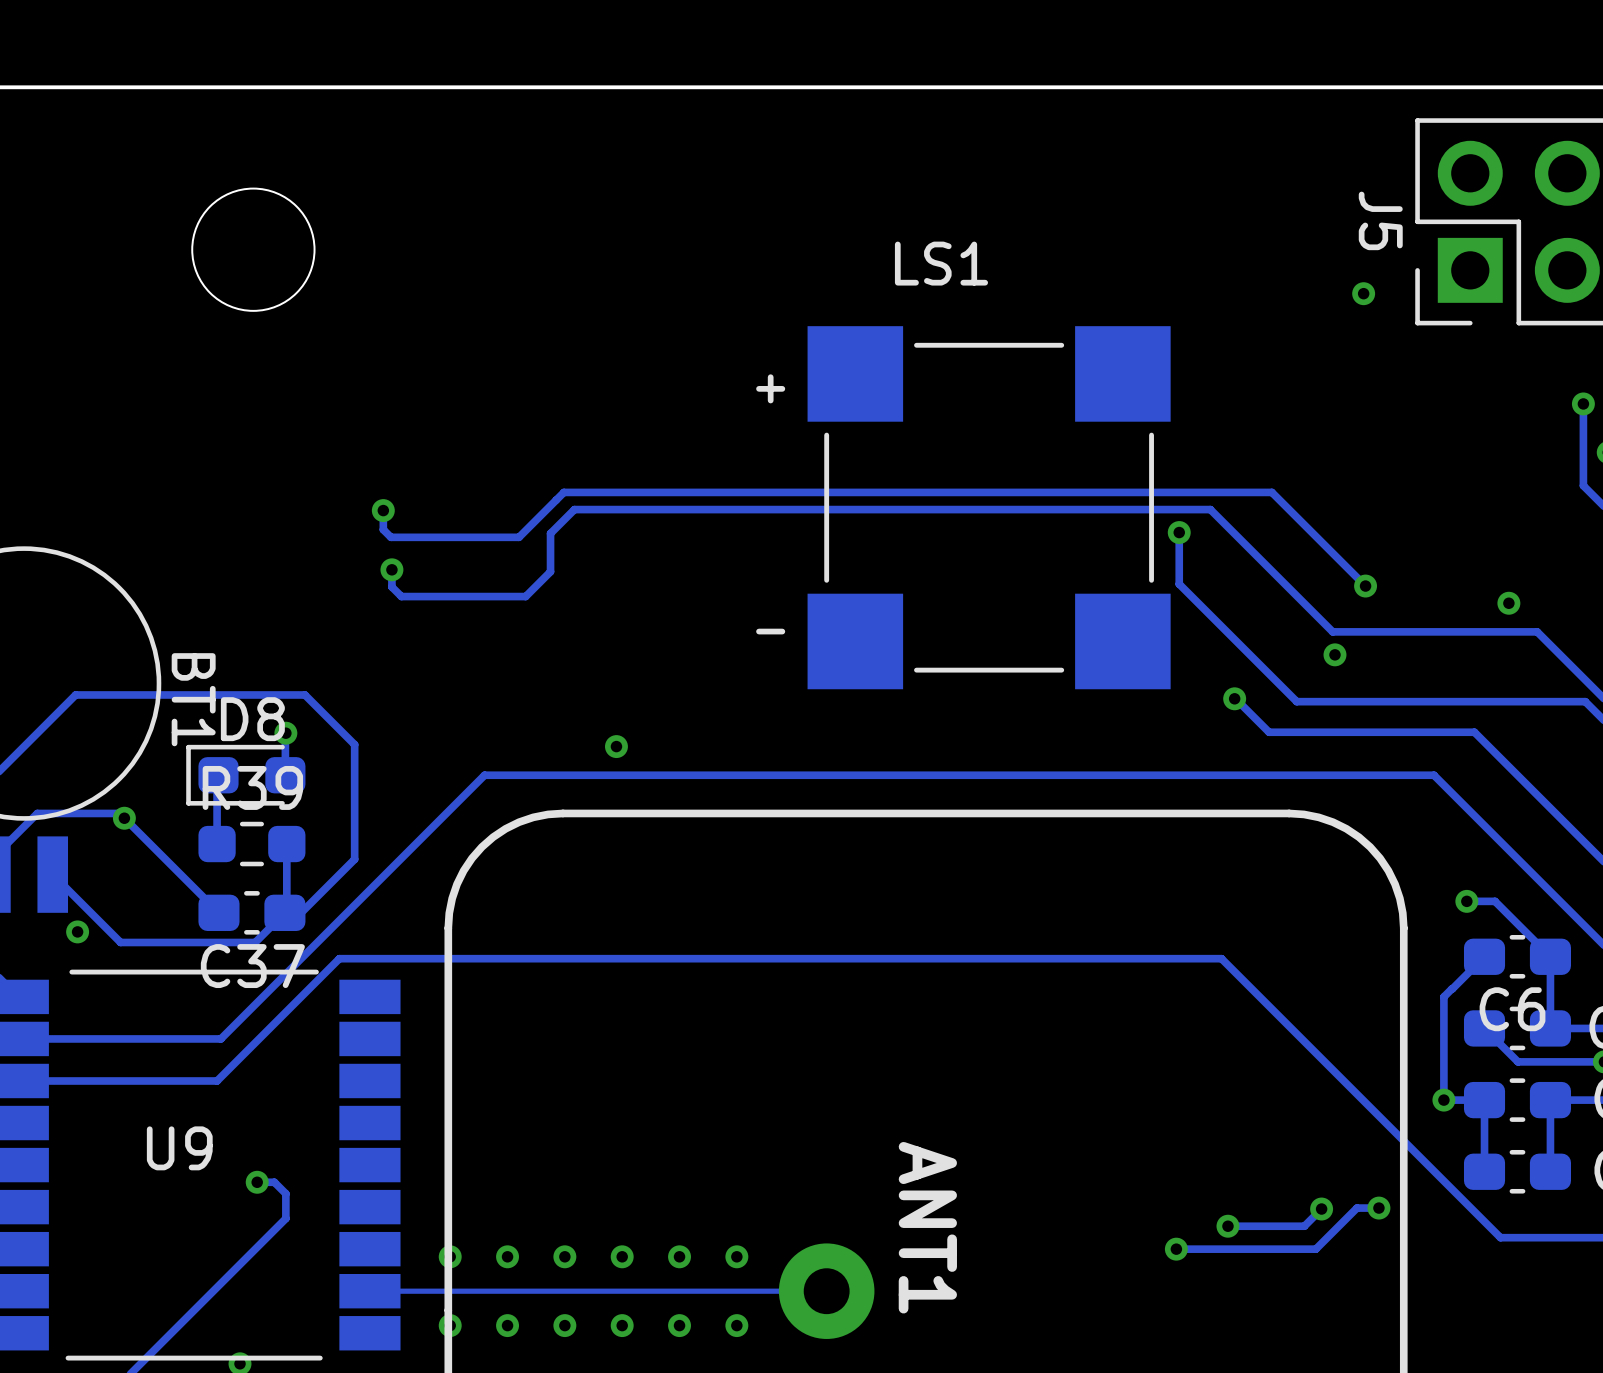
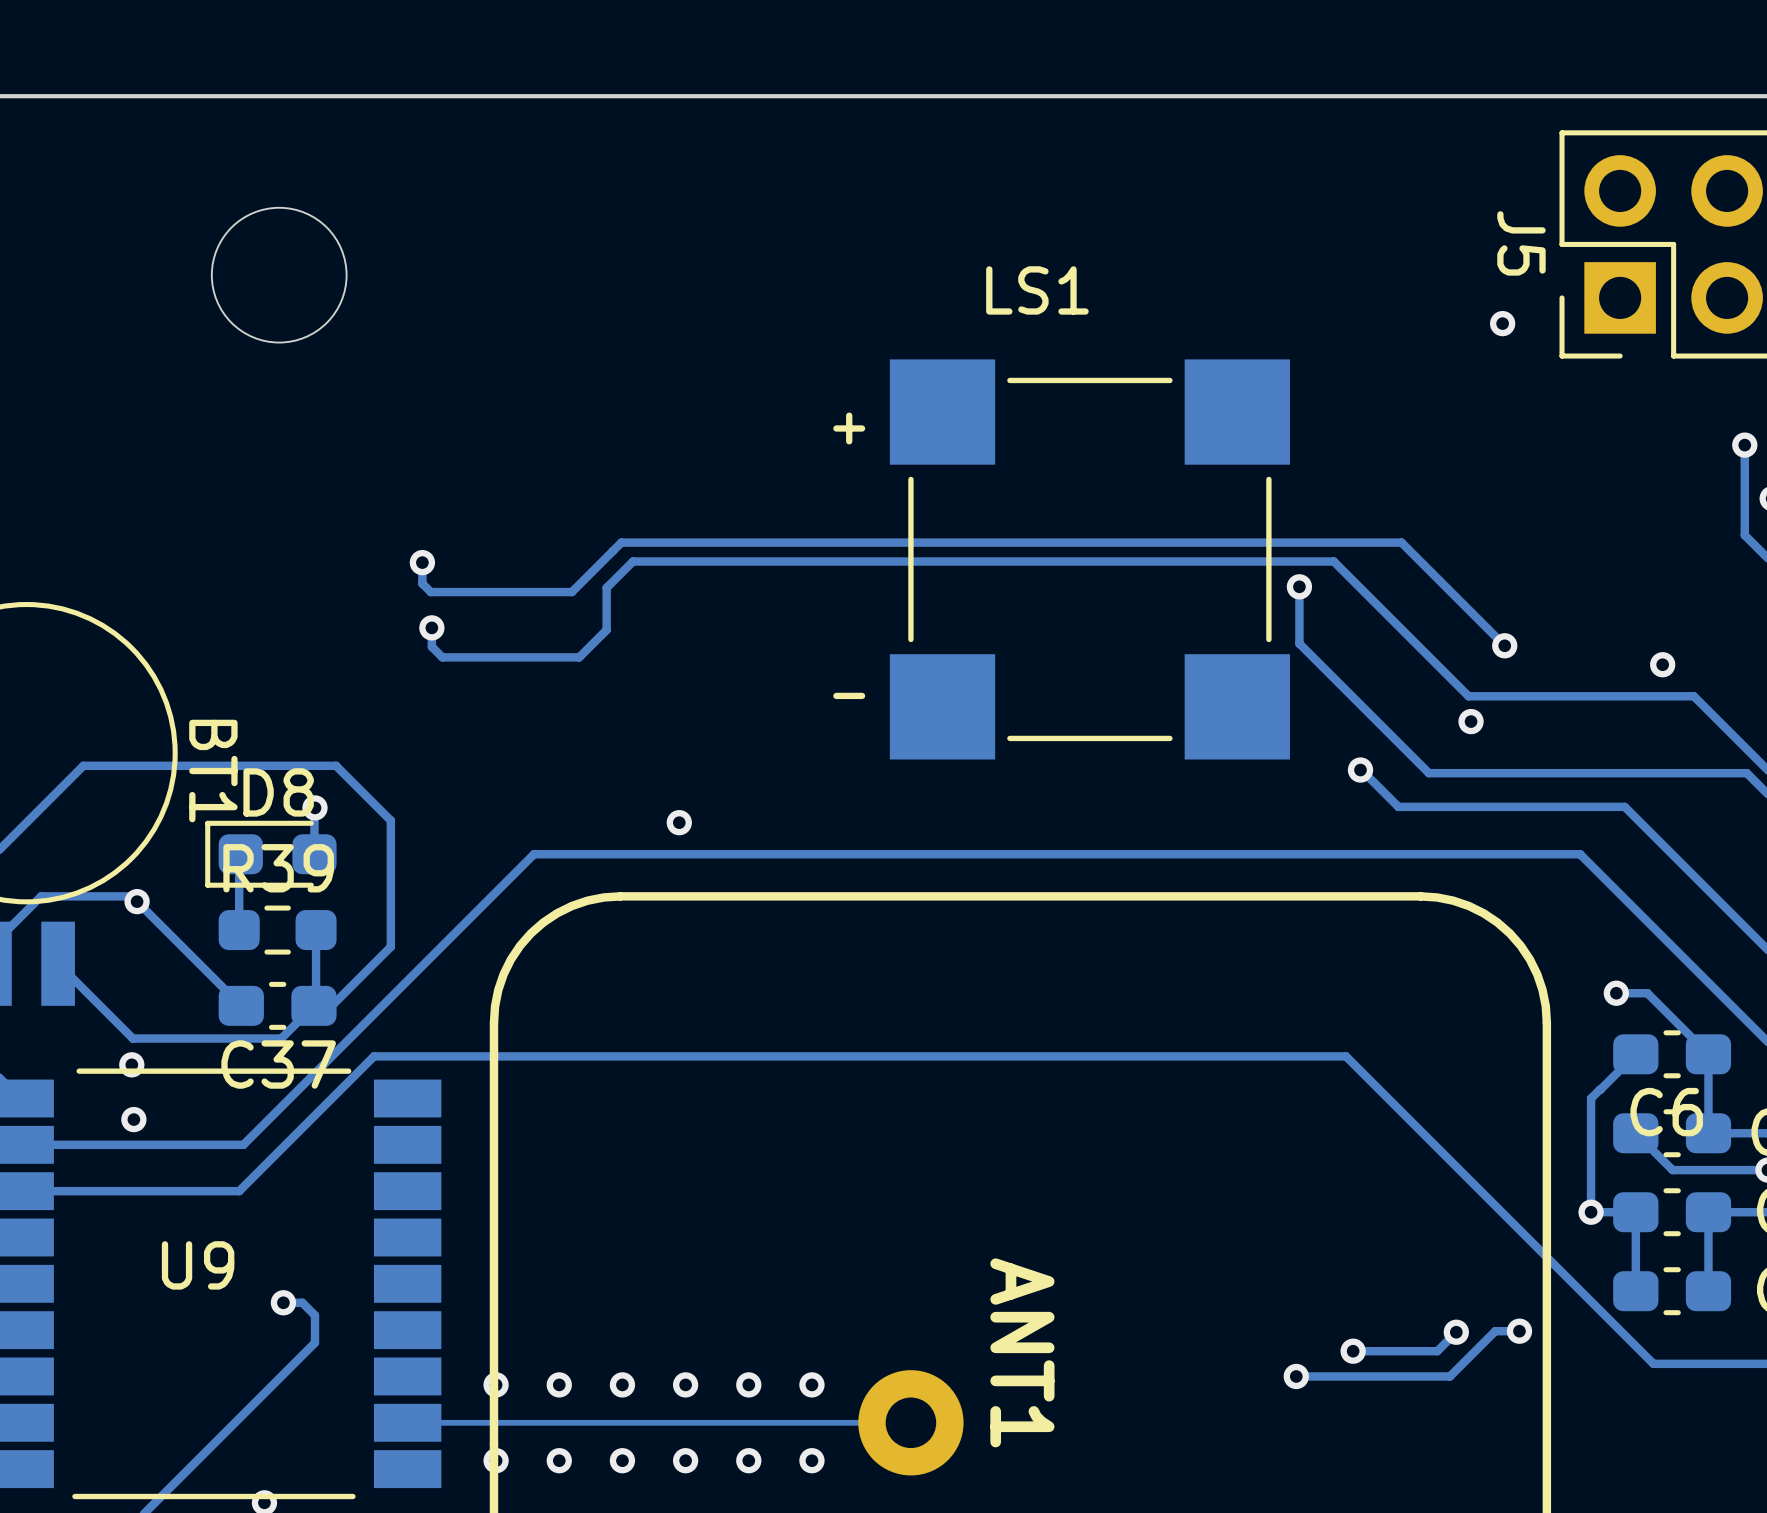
via: (77, 931) -> none
via: none -> (131, 1064)
via: none -> (133, 1119)

